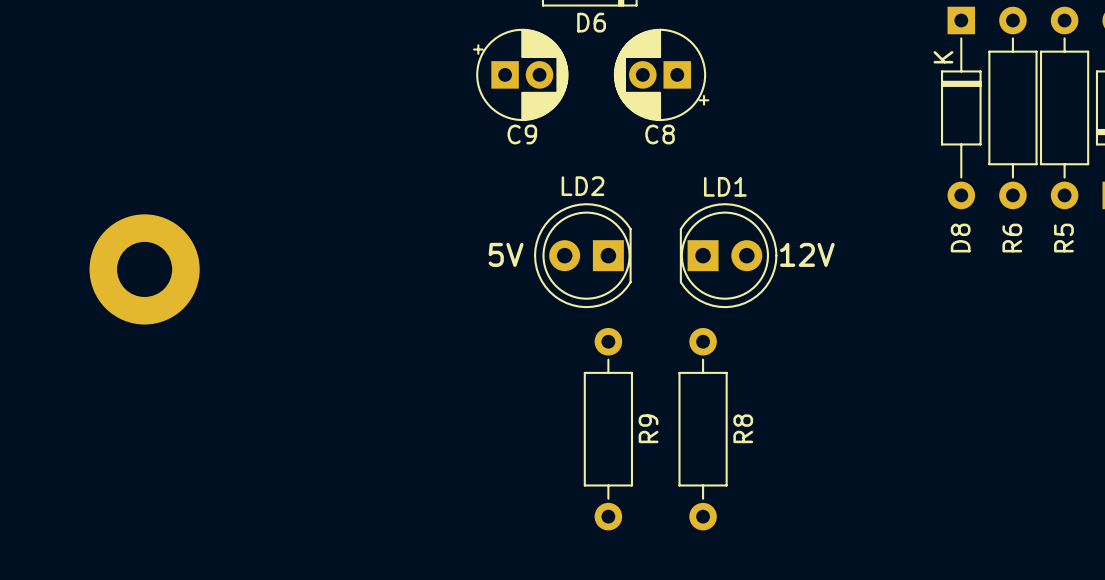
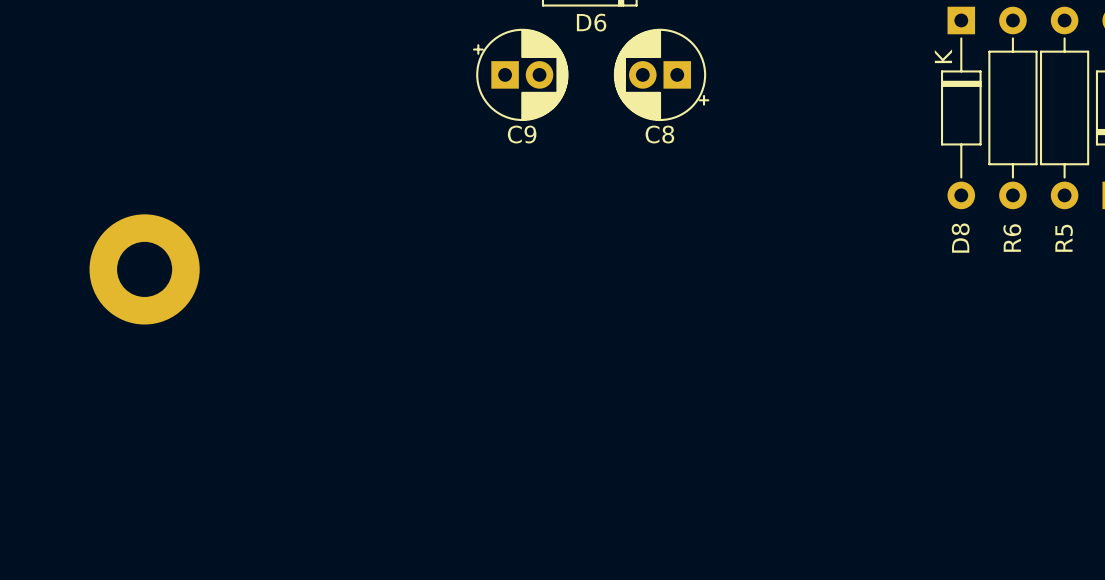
text: 5V (506, 254) -> none
text: 12V (807, 254) -> none
LD2: (582, 255) -> none
LD1: (728, 255) -> none
R9: (608, 429) -> none
R8: (703, 429) -> none

